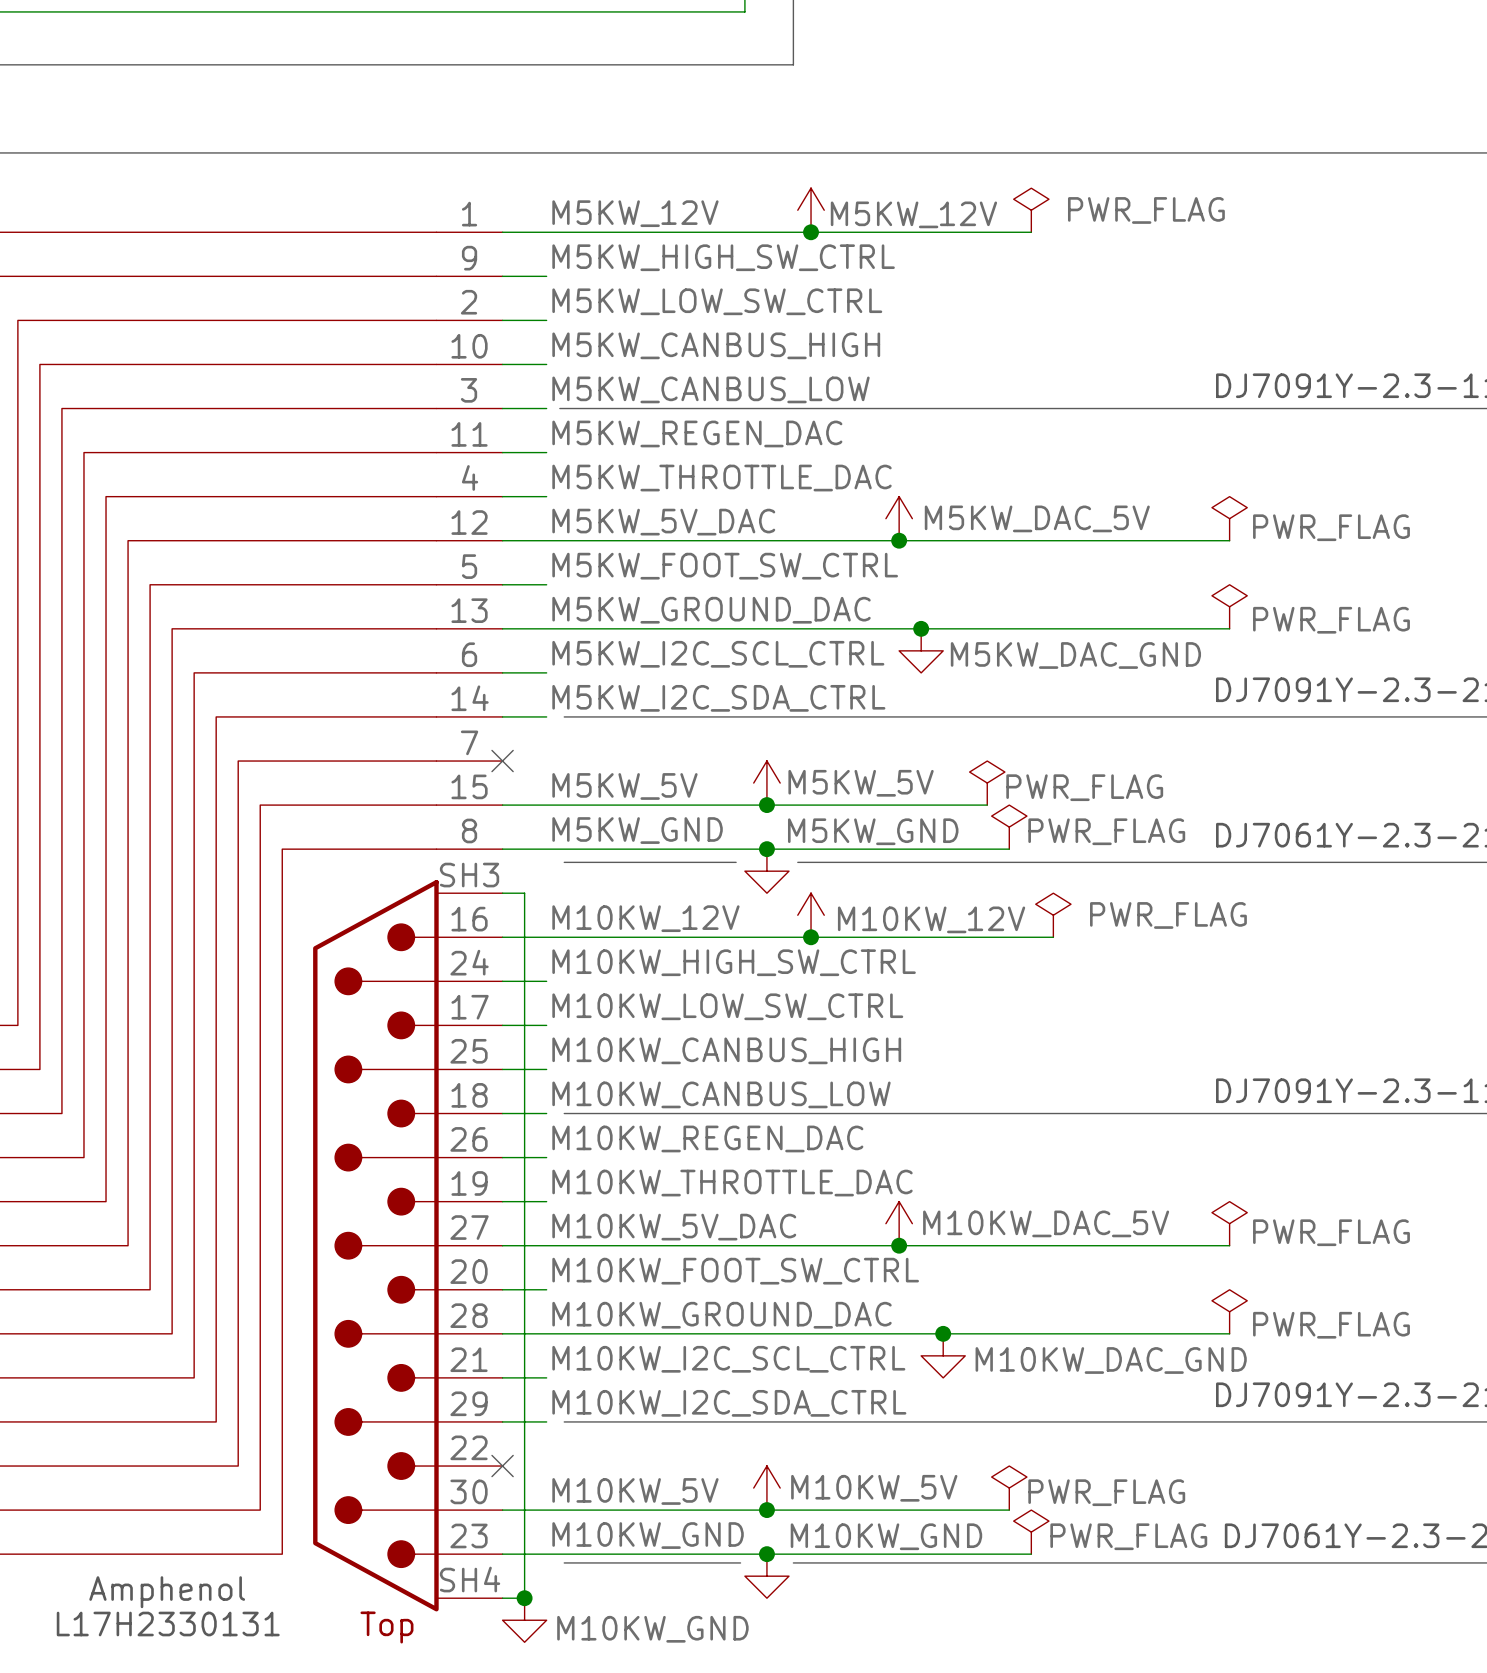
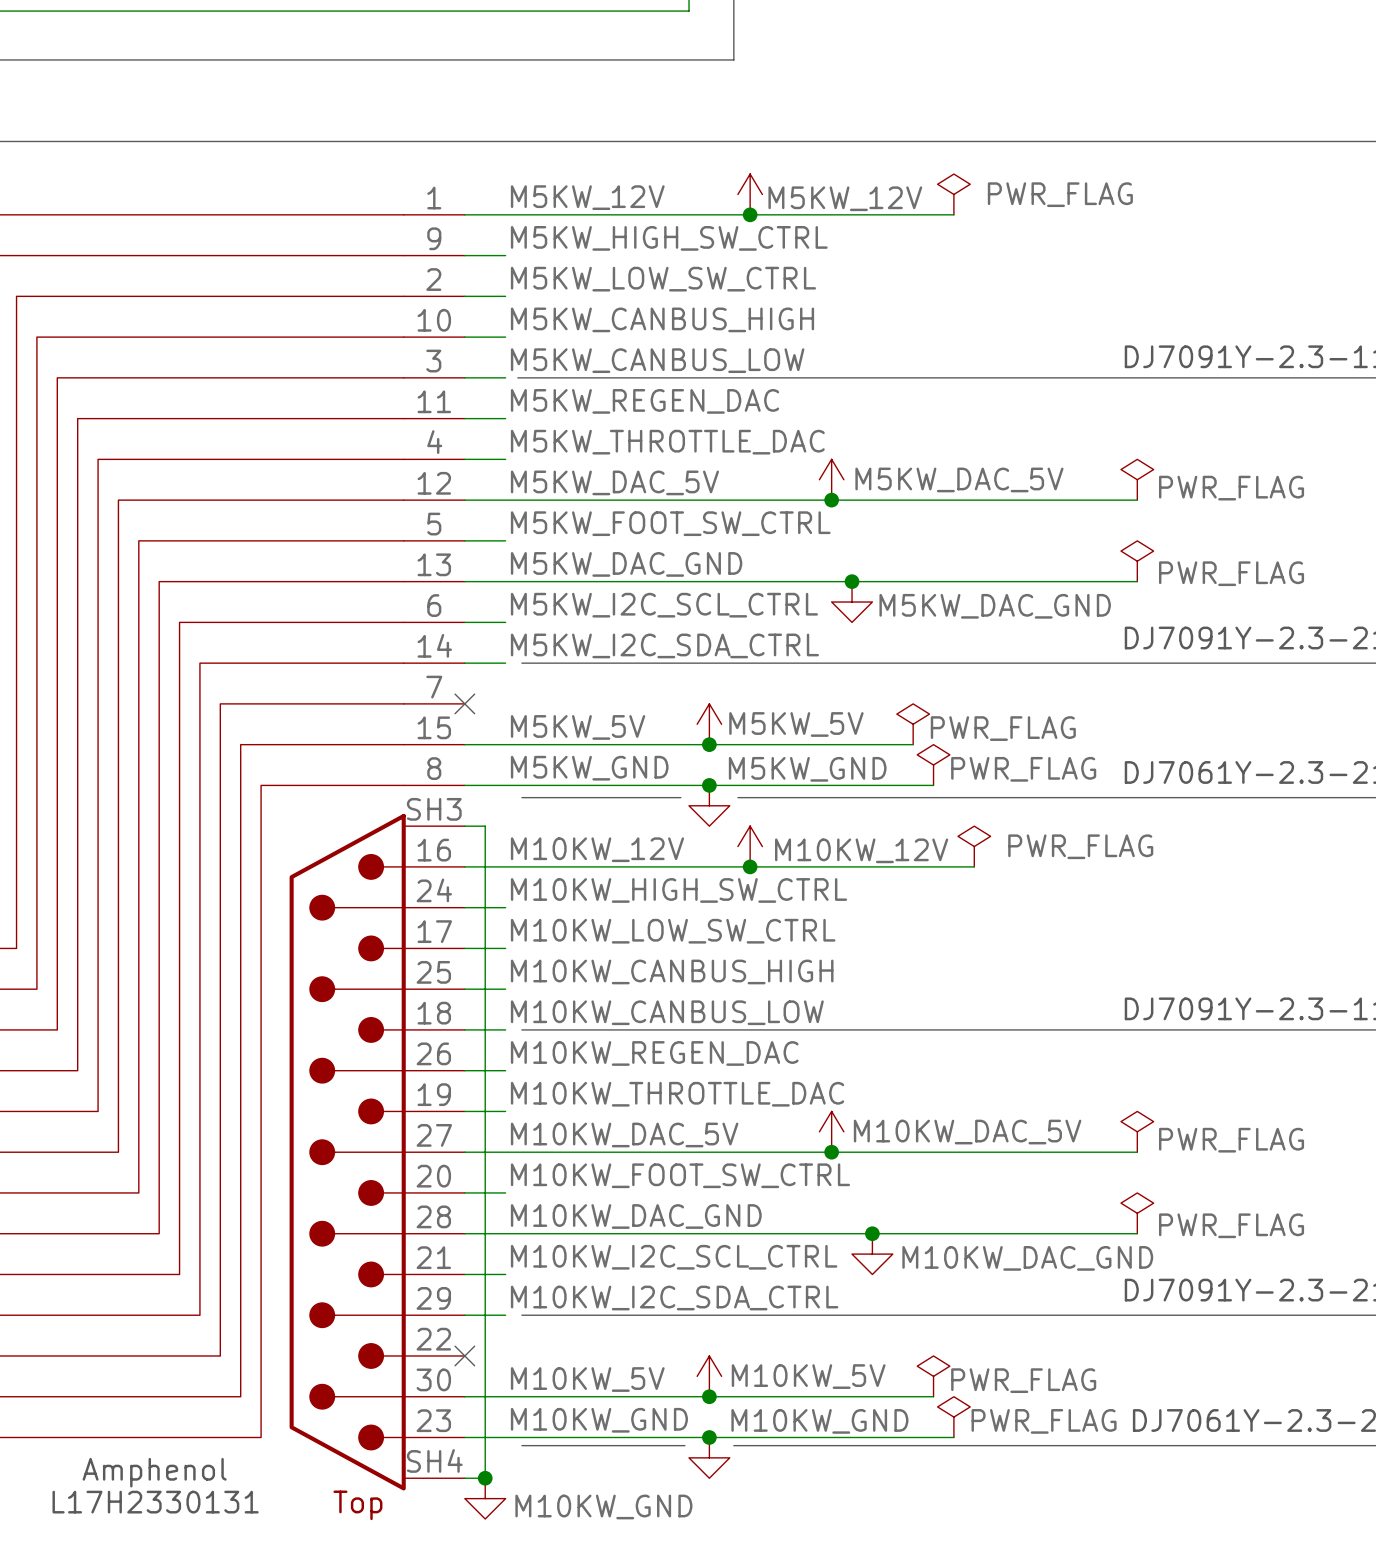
label: M5KW_5V_DAC (663, 522) -> M5KW_DAC_5V (614, 482)
label: M5KW_GROUND_DAC (711, 610) -> M5KW_DAC_GND (626, 564)
label: M10KW_5V_DAC (674, 1227) -> M10KW_DAC_5V (624, 1134)
label: M10KW_GROUND_DAC (722, 1315) -> M10KW_DAC_GND (636, 1216)

